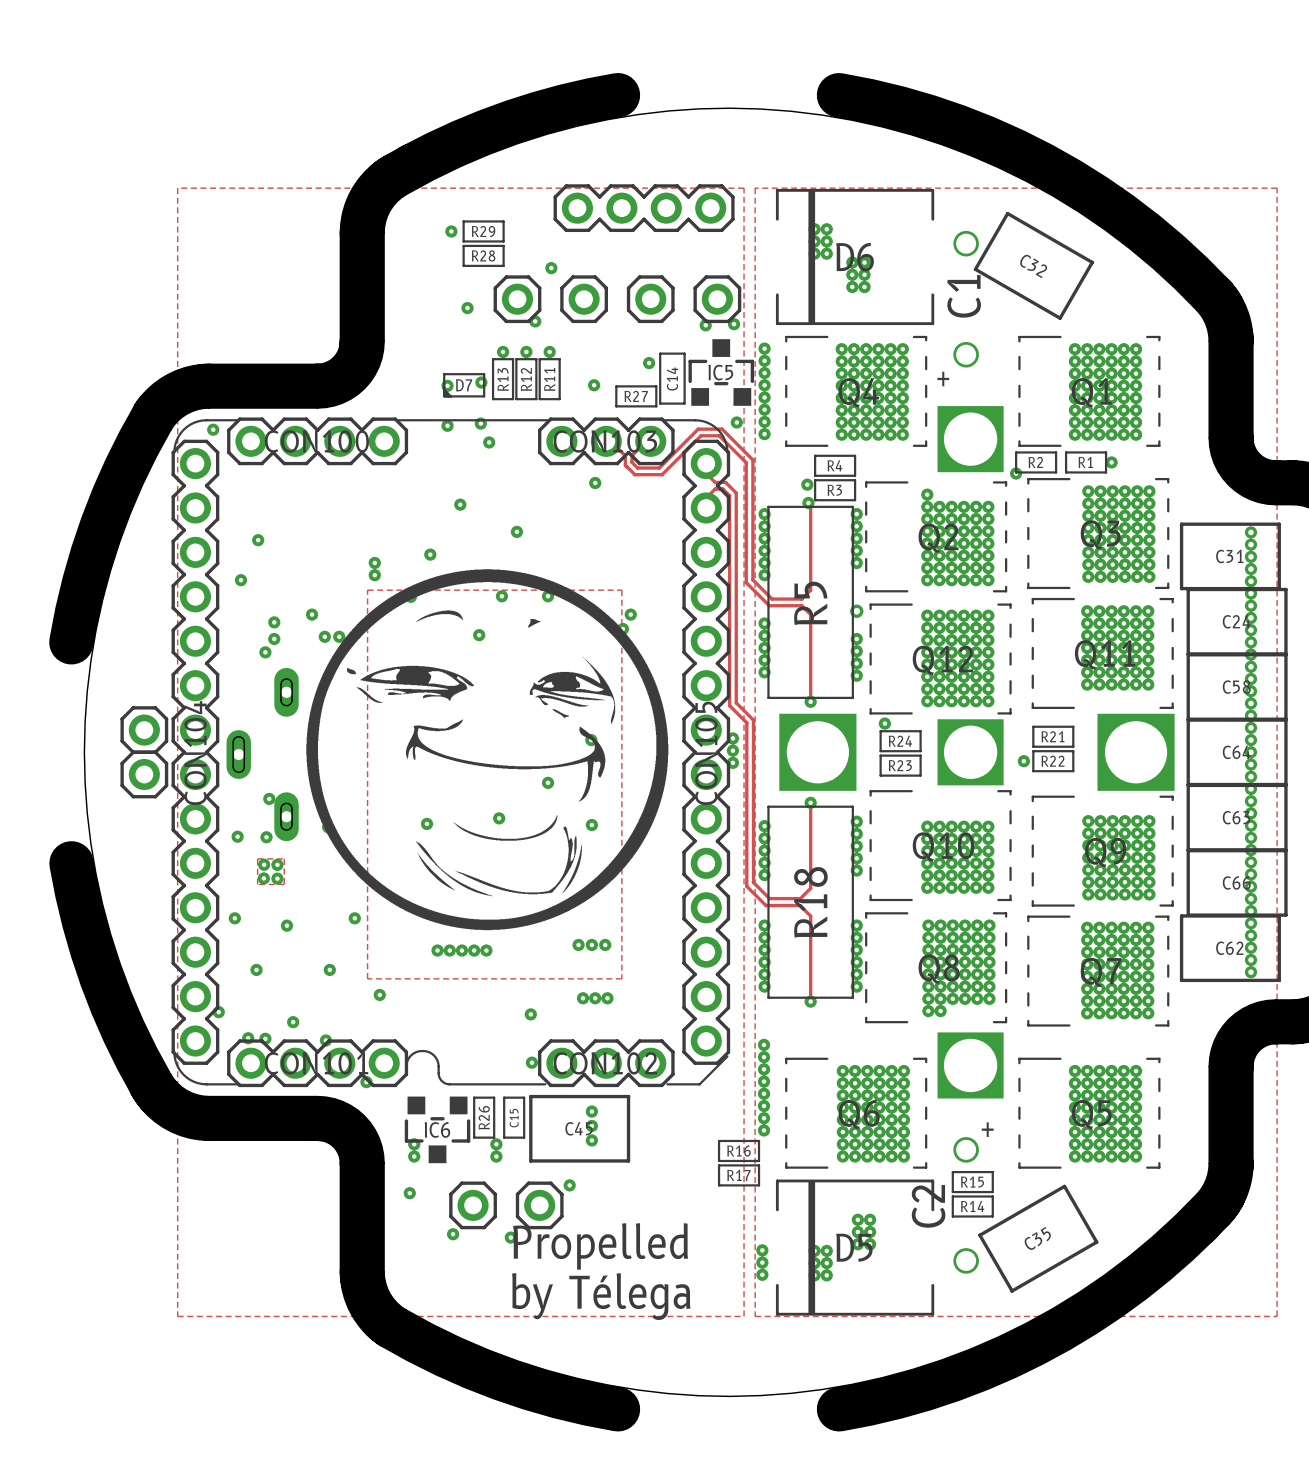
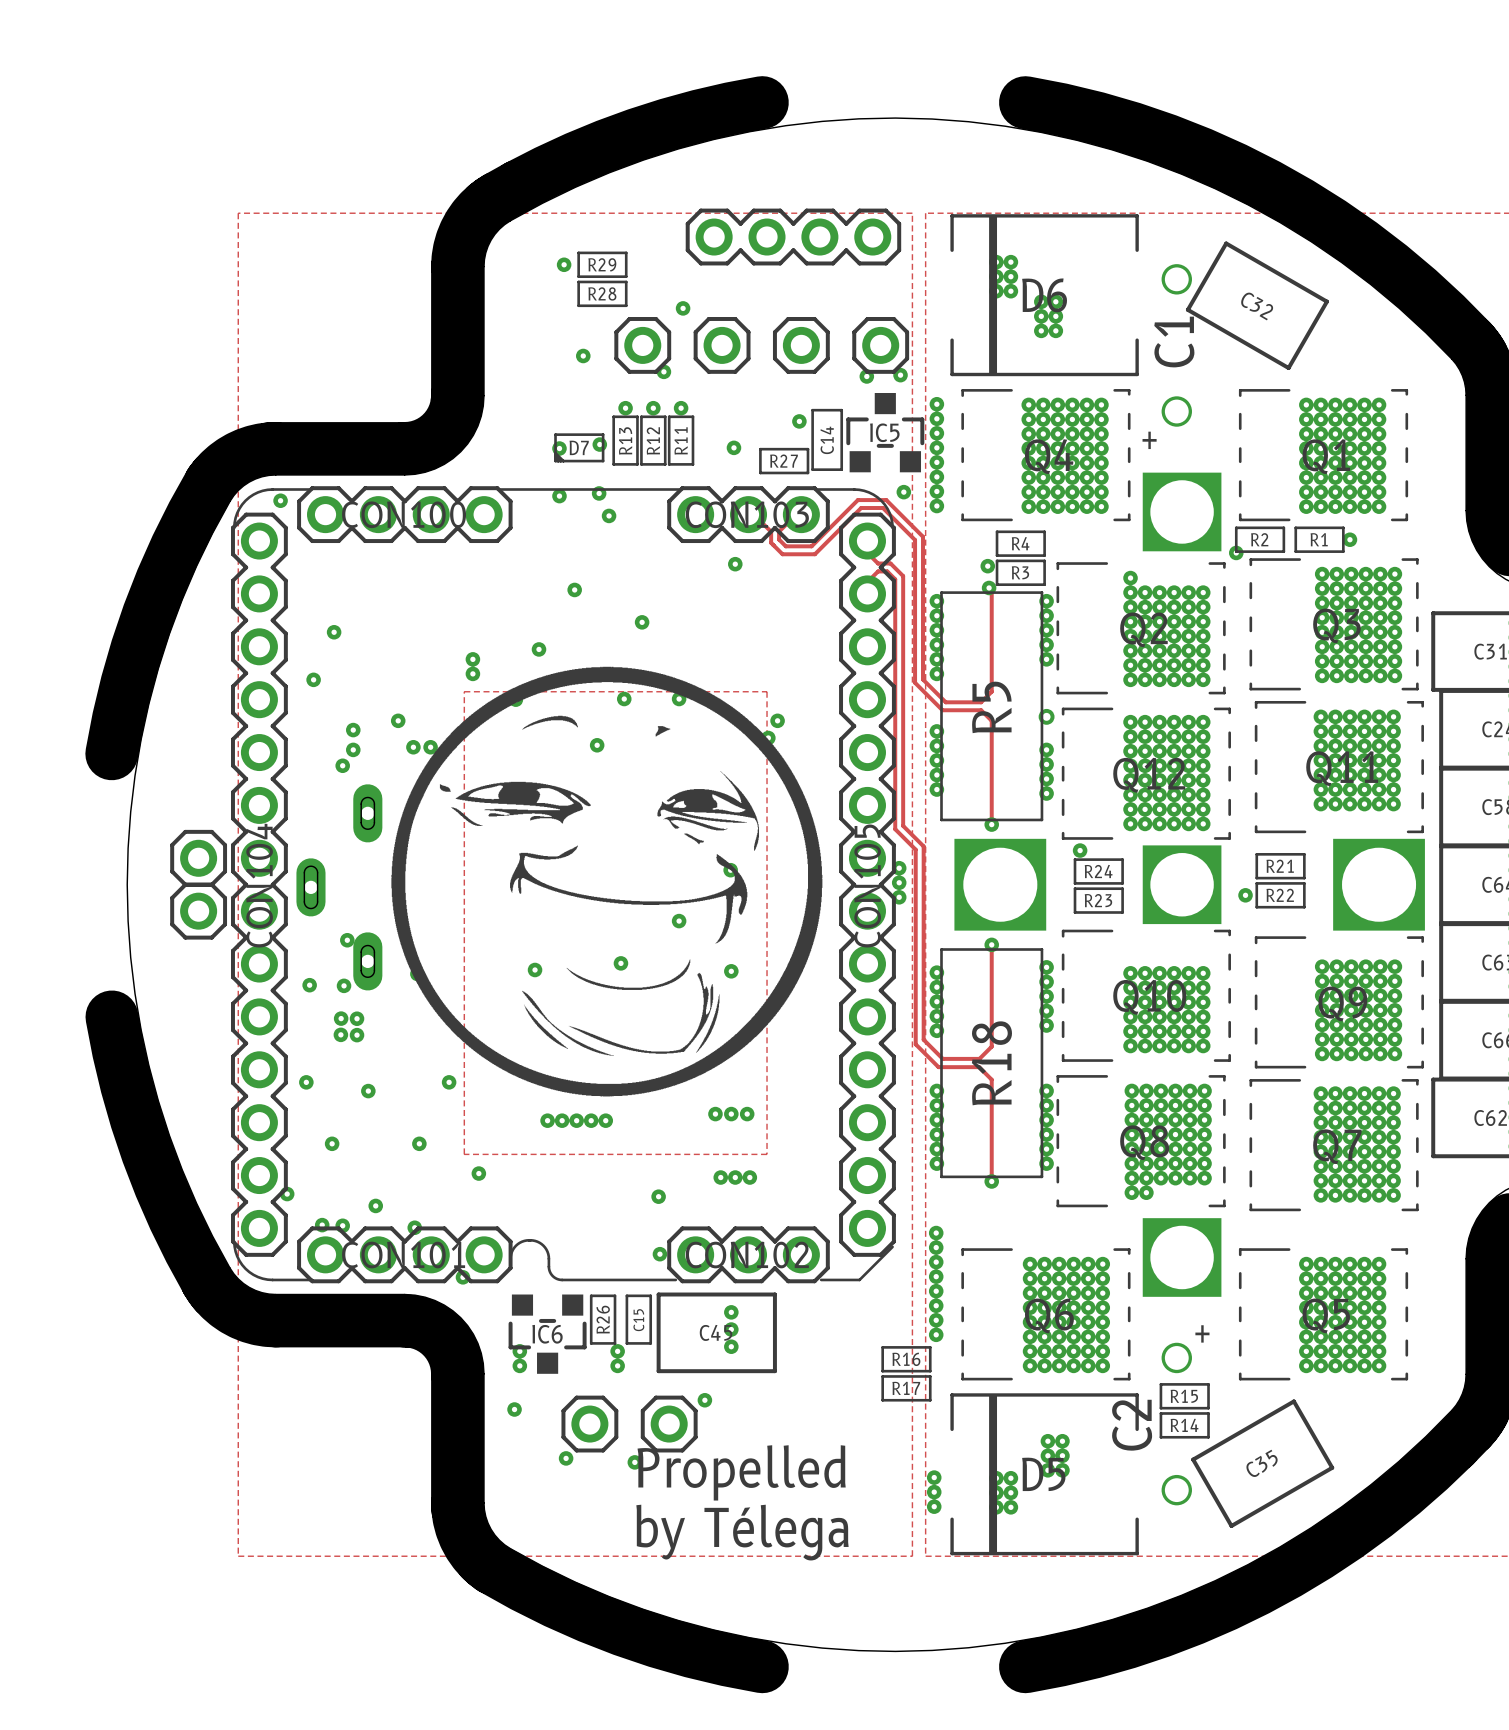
zone outline: (257, 858) (284, 858) (284, 884) (257, 884) (257, 858) -> none

